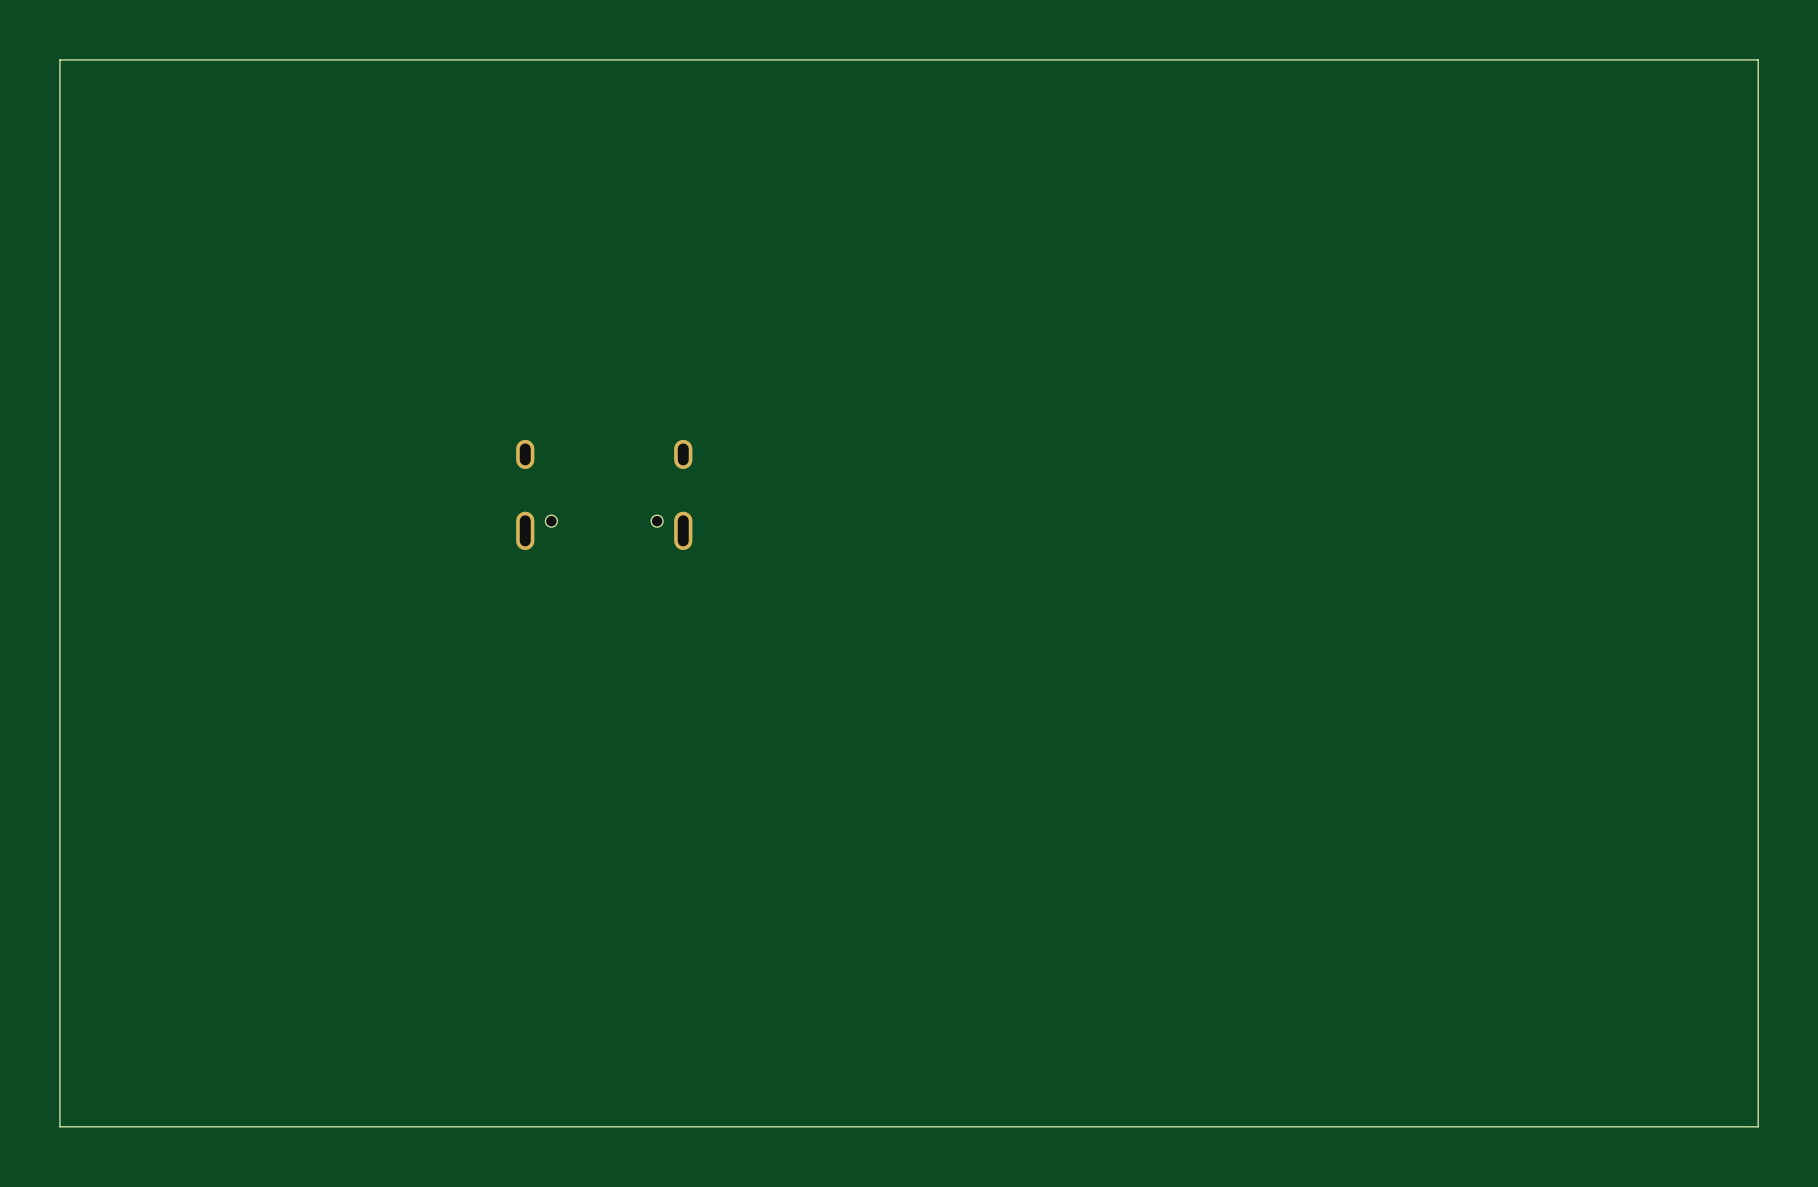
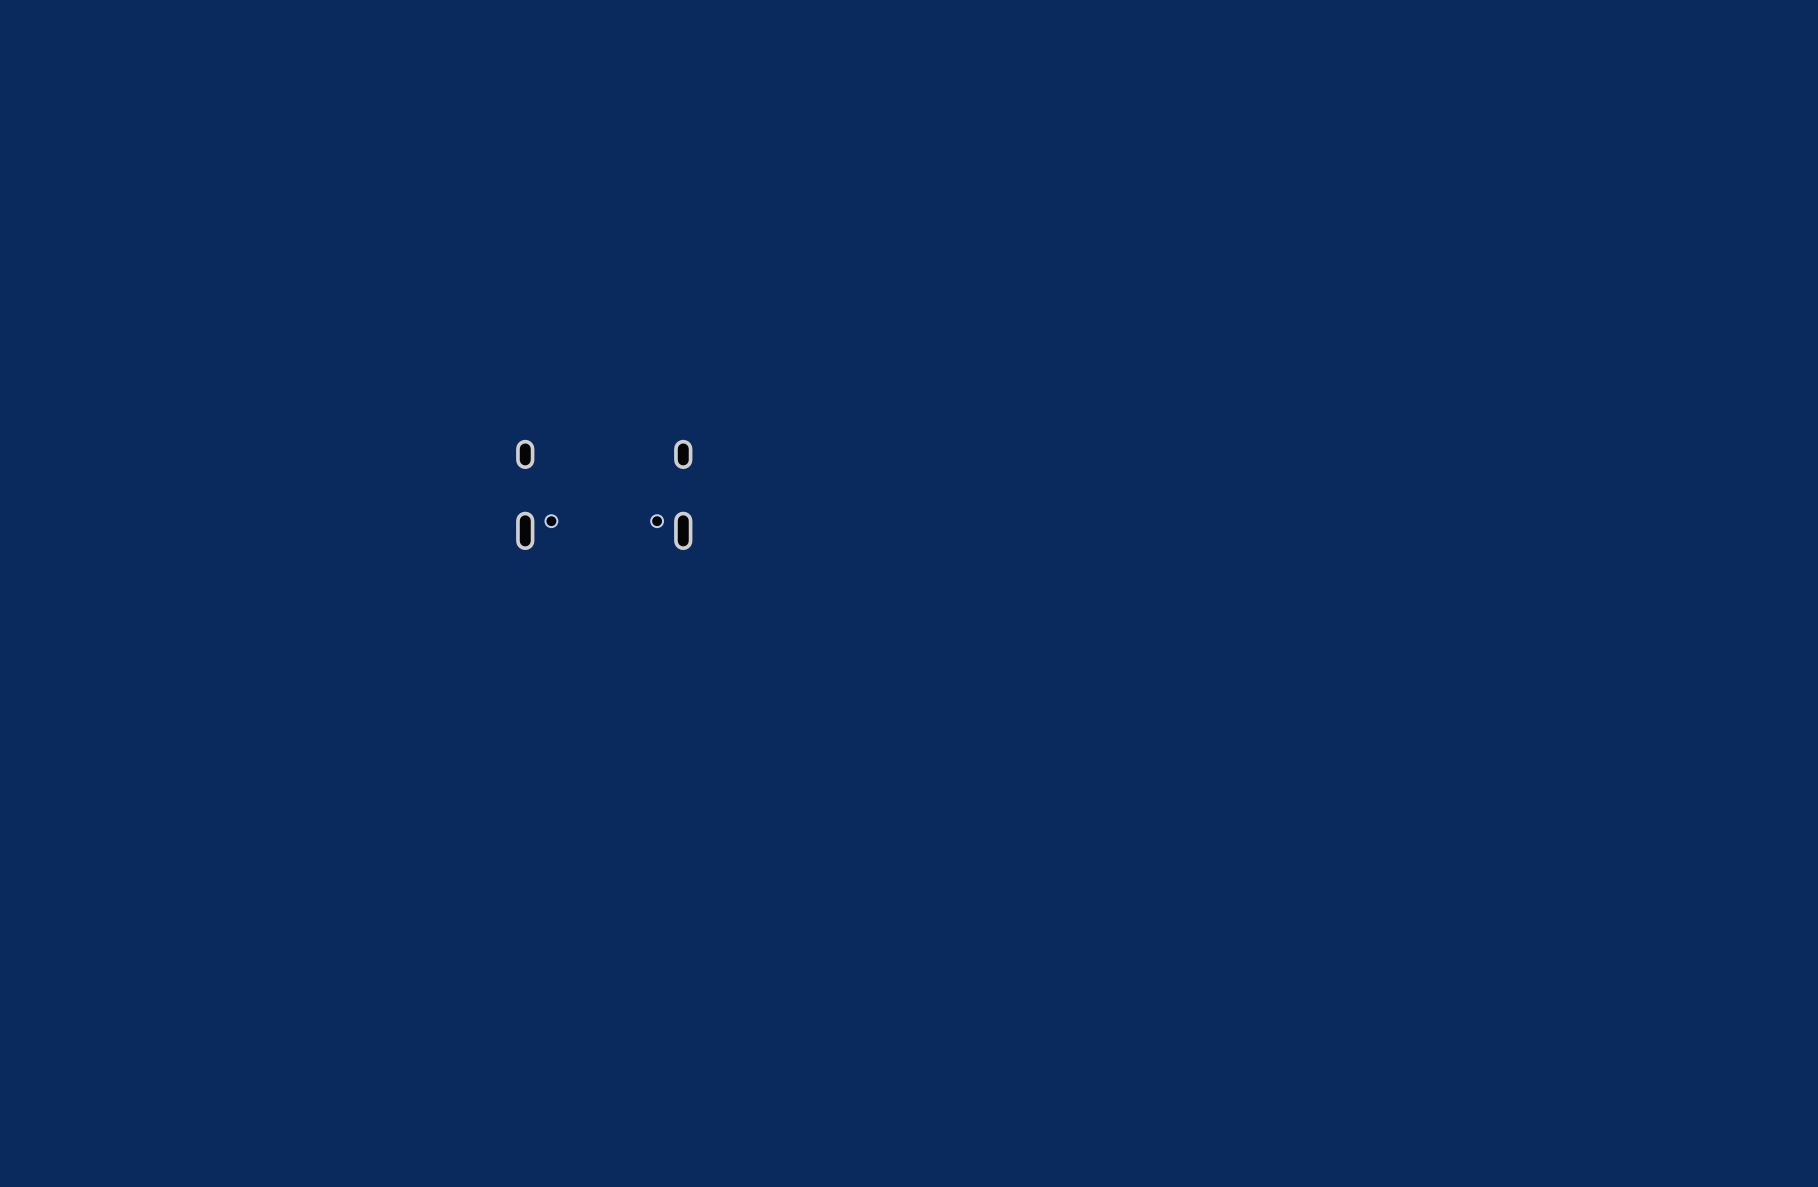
board edge: (59, 59) (1758, 59) (1758, 1126) (59, 1126) (59, 59) -> none

